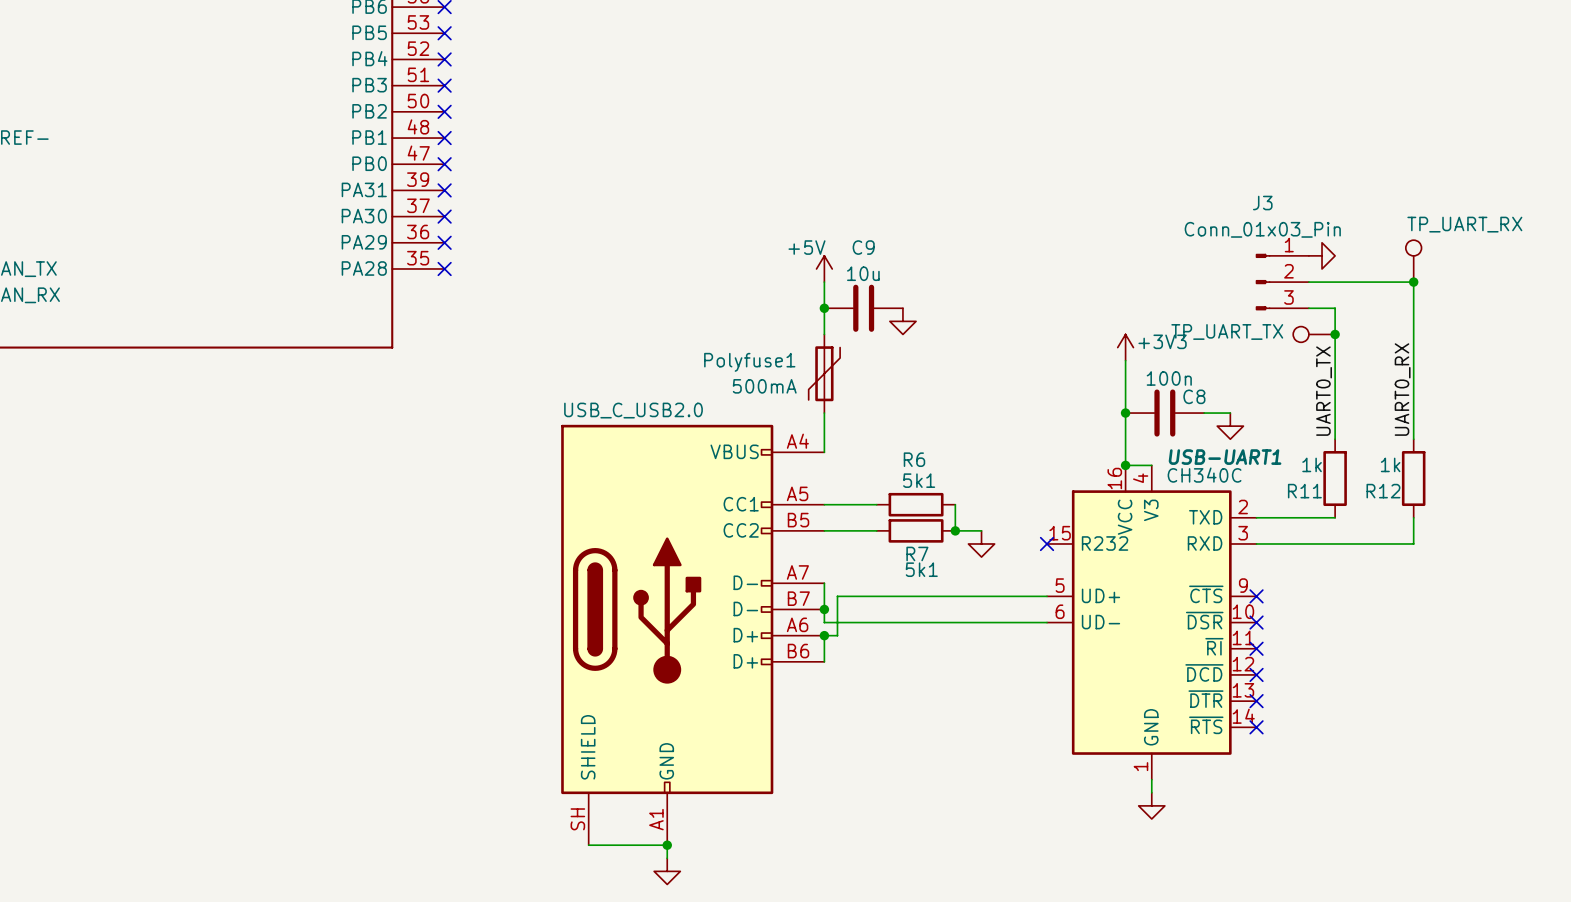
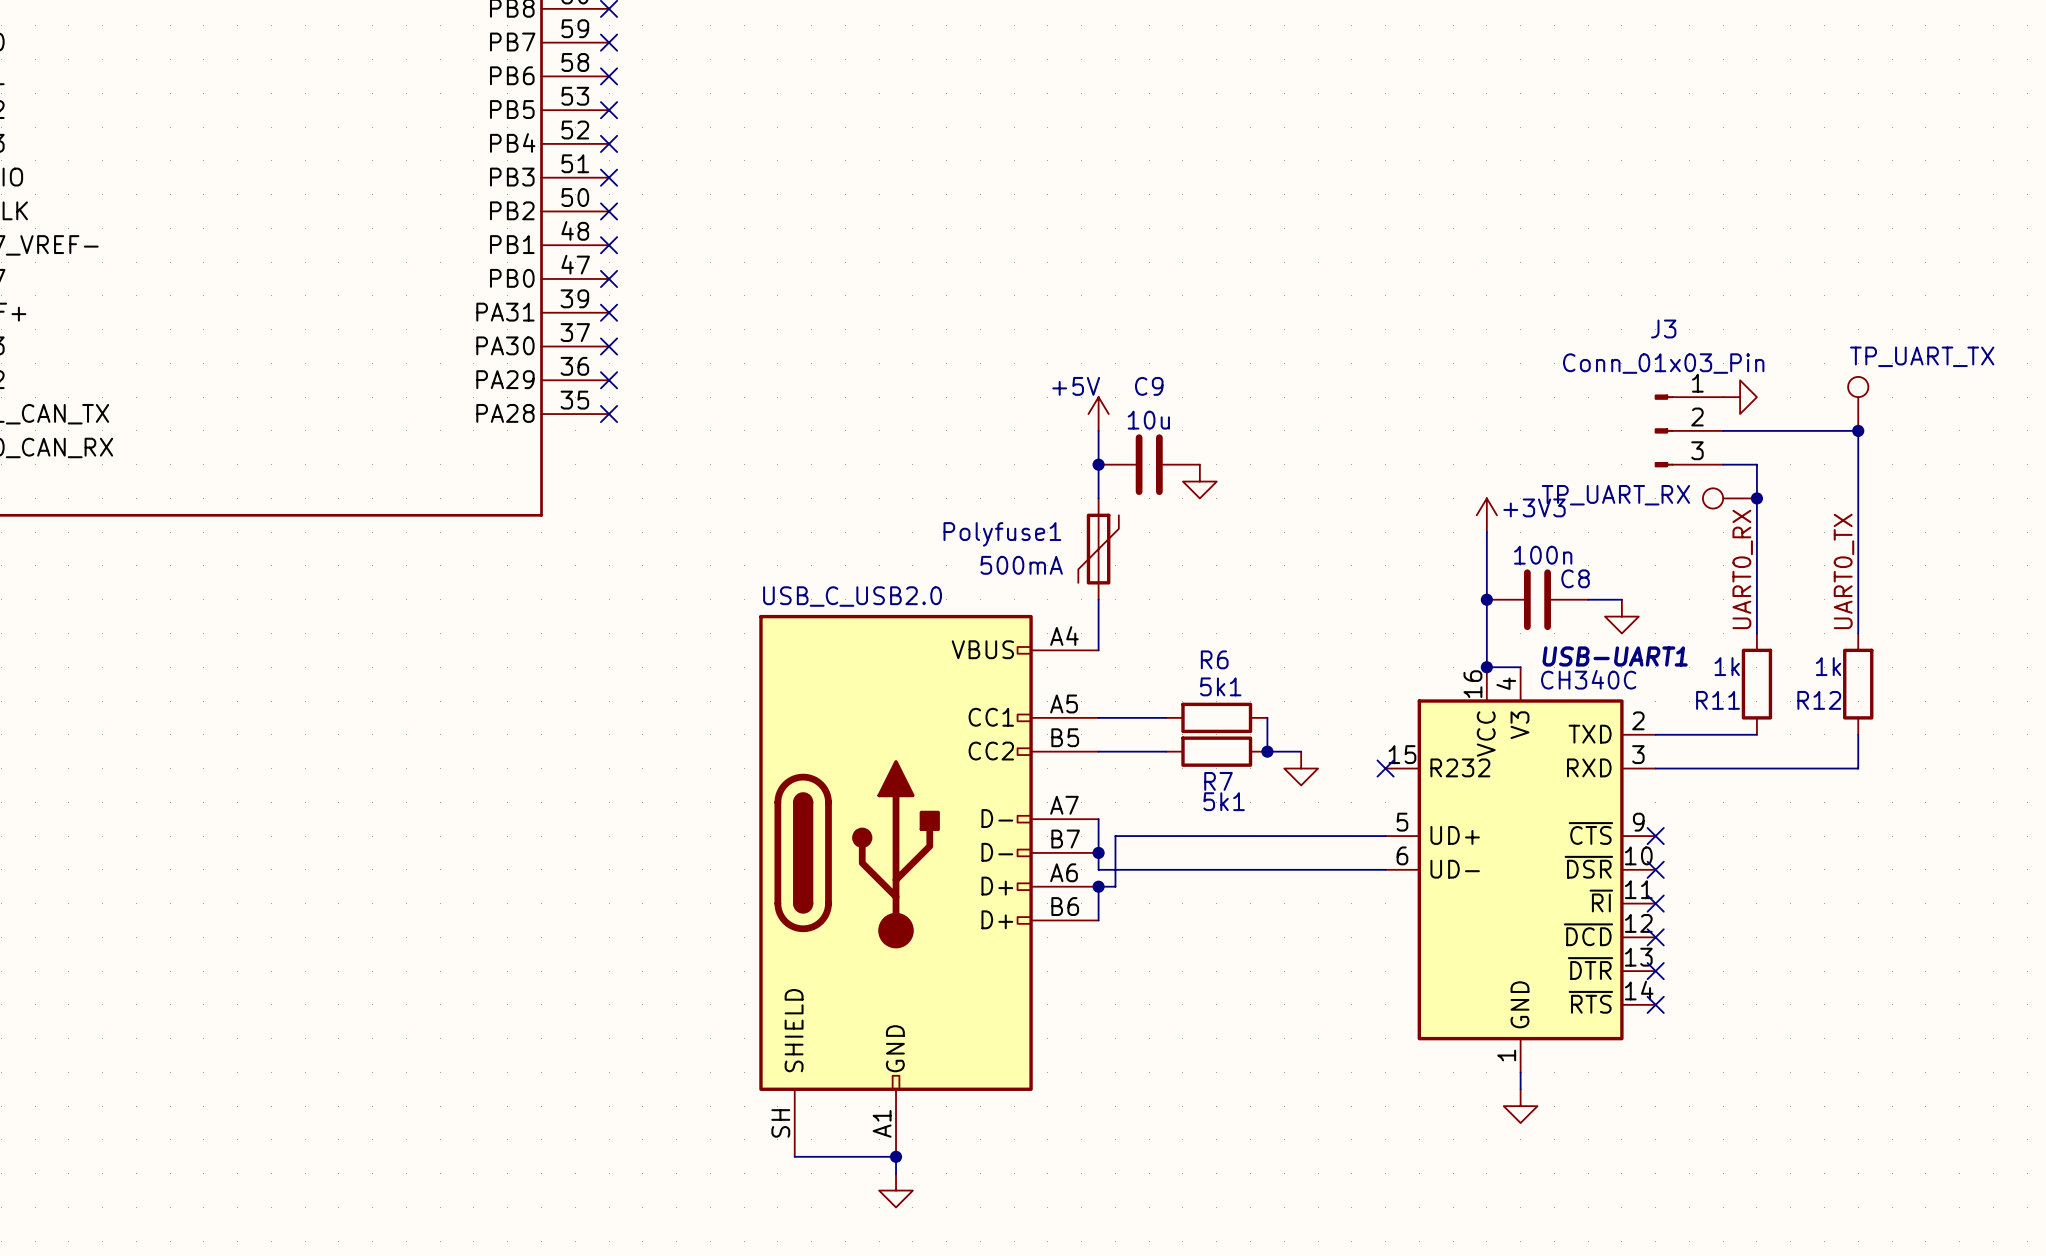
part value: TP_UART_RX (1464, 224) -> TP_UART_TX (1922, 356)
part value: TP_UART_TX (1227, 331) -> TP_UART_RX (1615, 495)
label: UART0_RX (1402, 389) -> UART0_TX (1843, 571)
label: UART0_TX (1324, 391) -> UART0_RX (1742, 569)

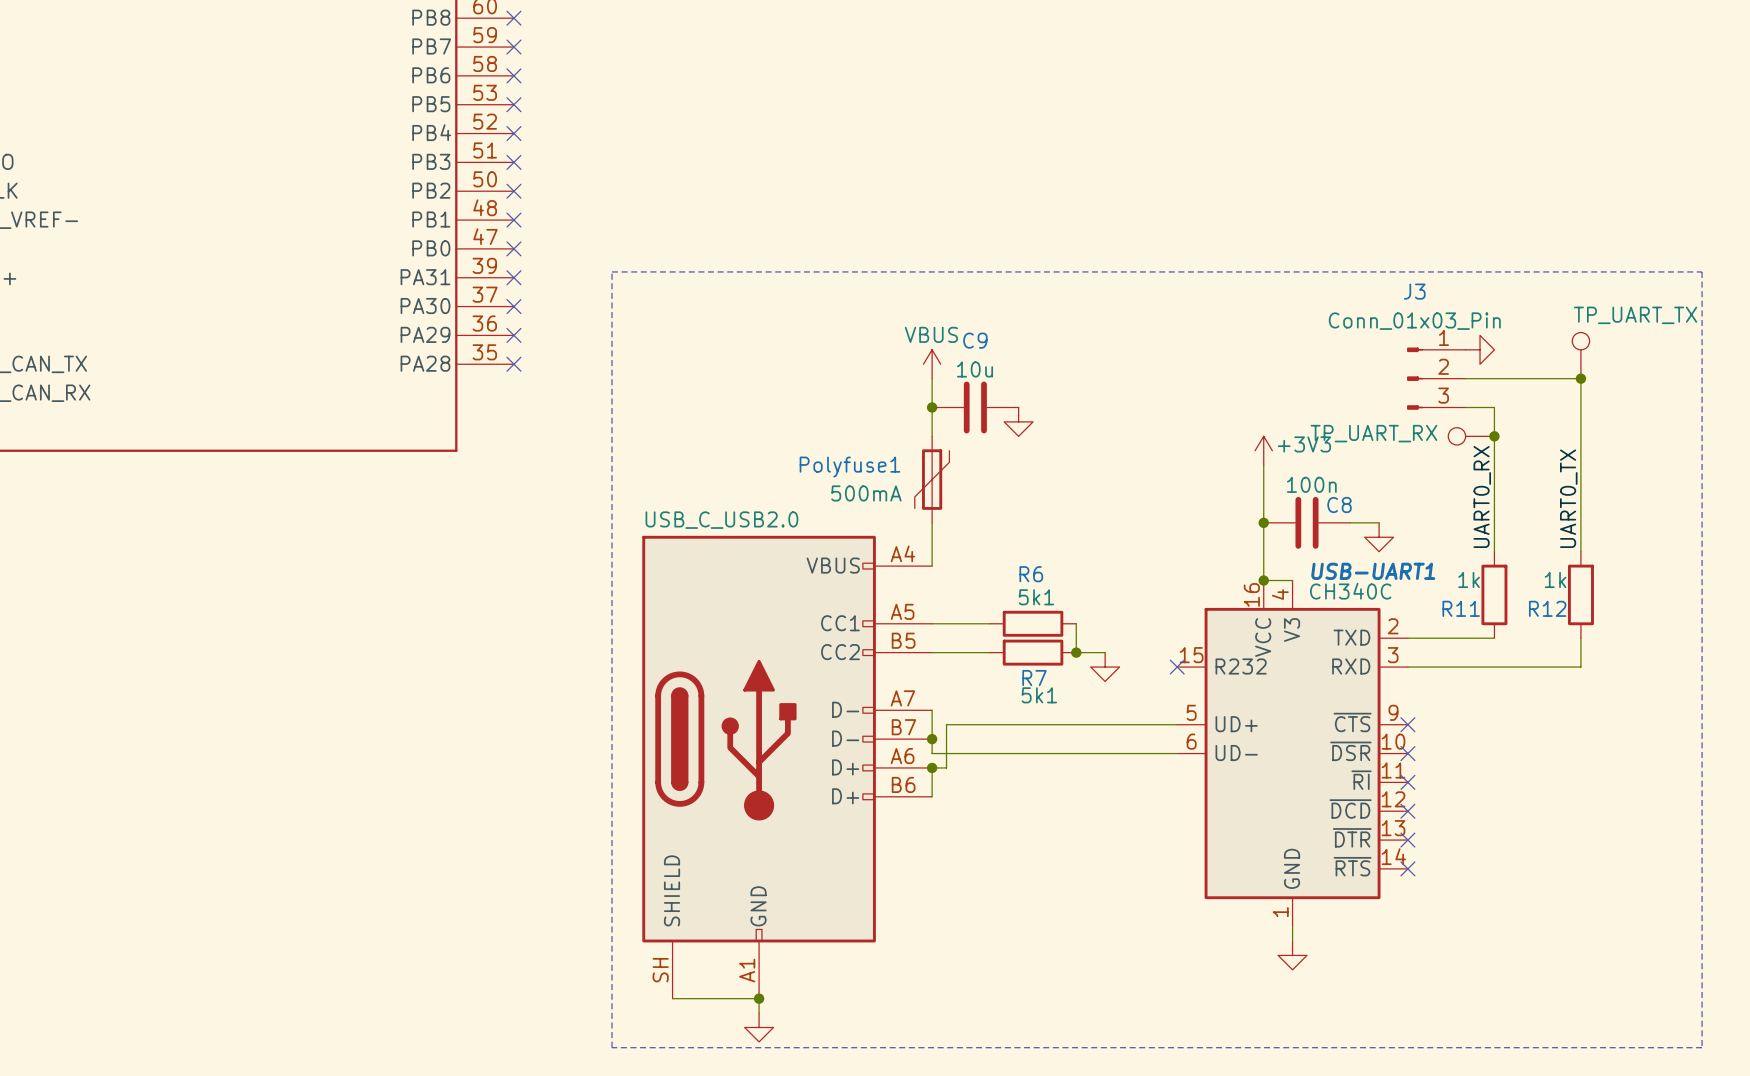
line: none -> (612, 271) (1702, 271) (1702, 1047) (612, 1047) (612, 271)
power symbol: +5V (1098, 414) -> VBUS (932, 364)

